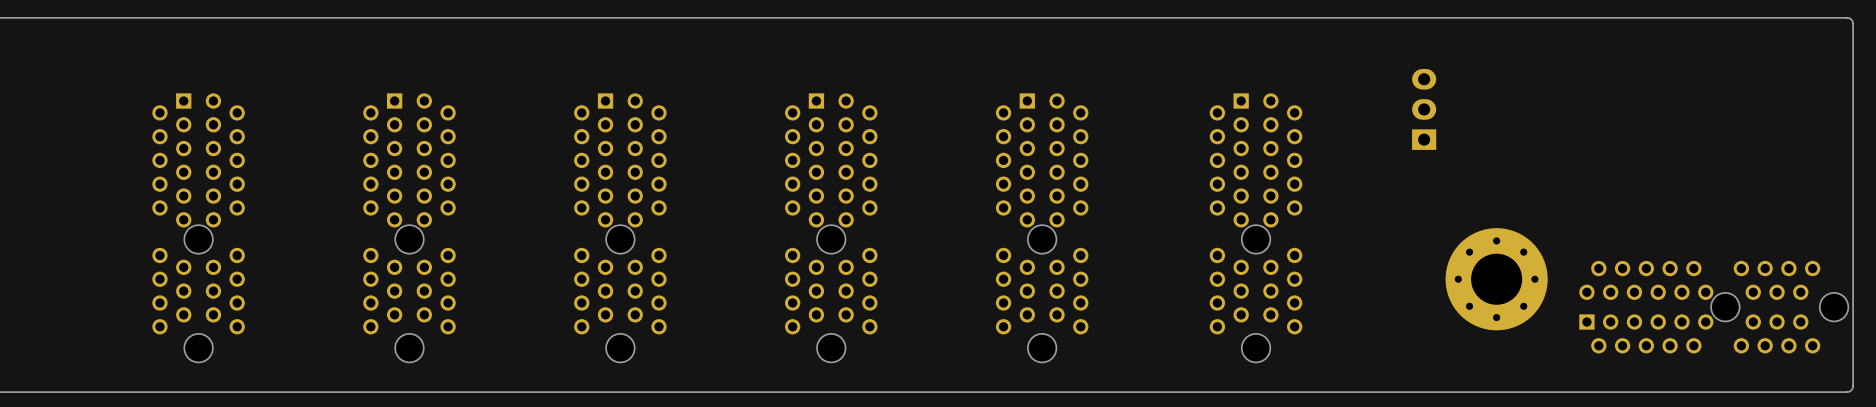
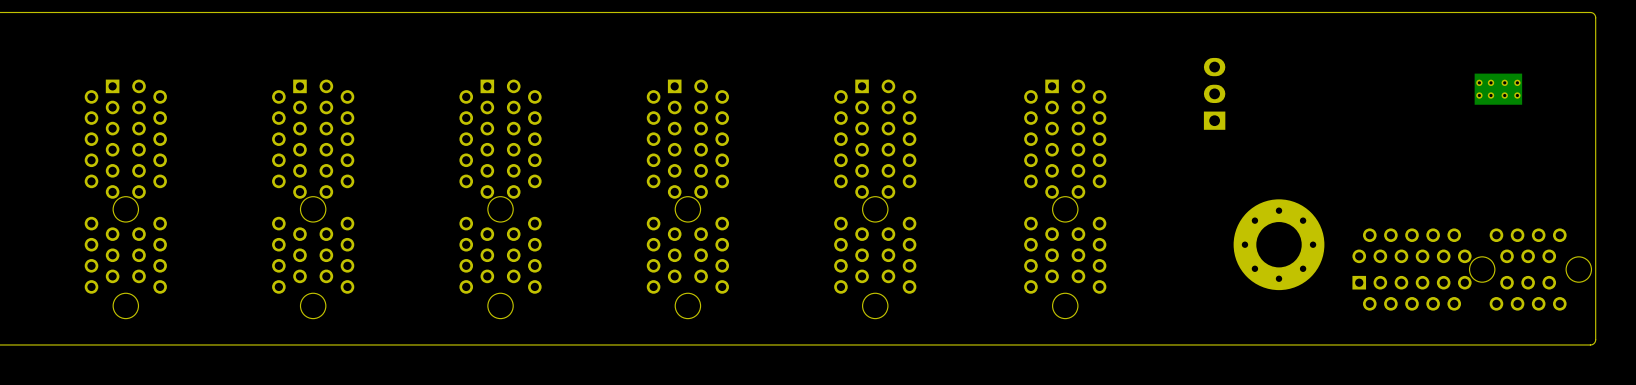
part: none -> (1498, 89)

